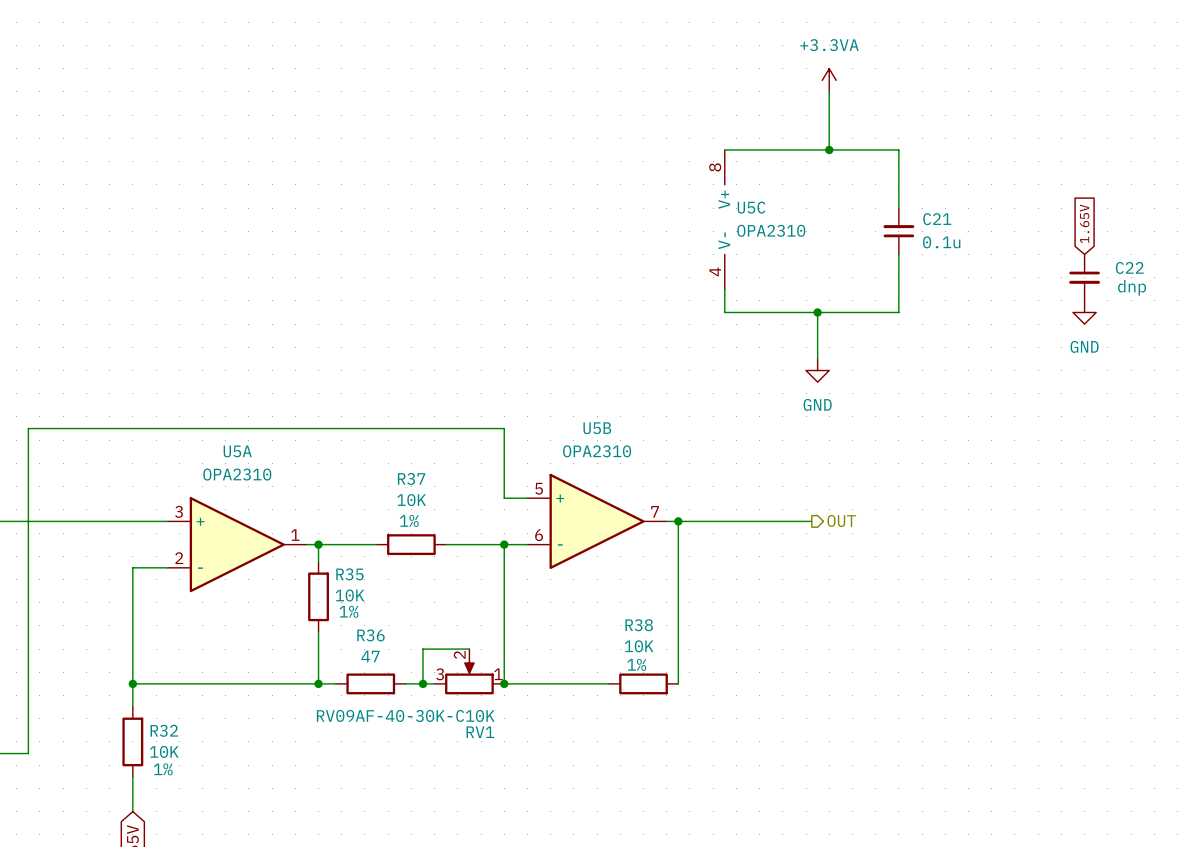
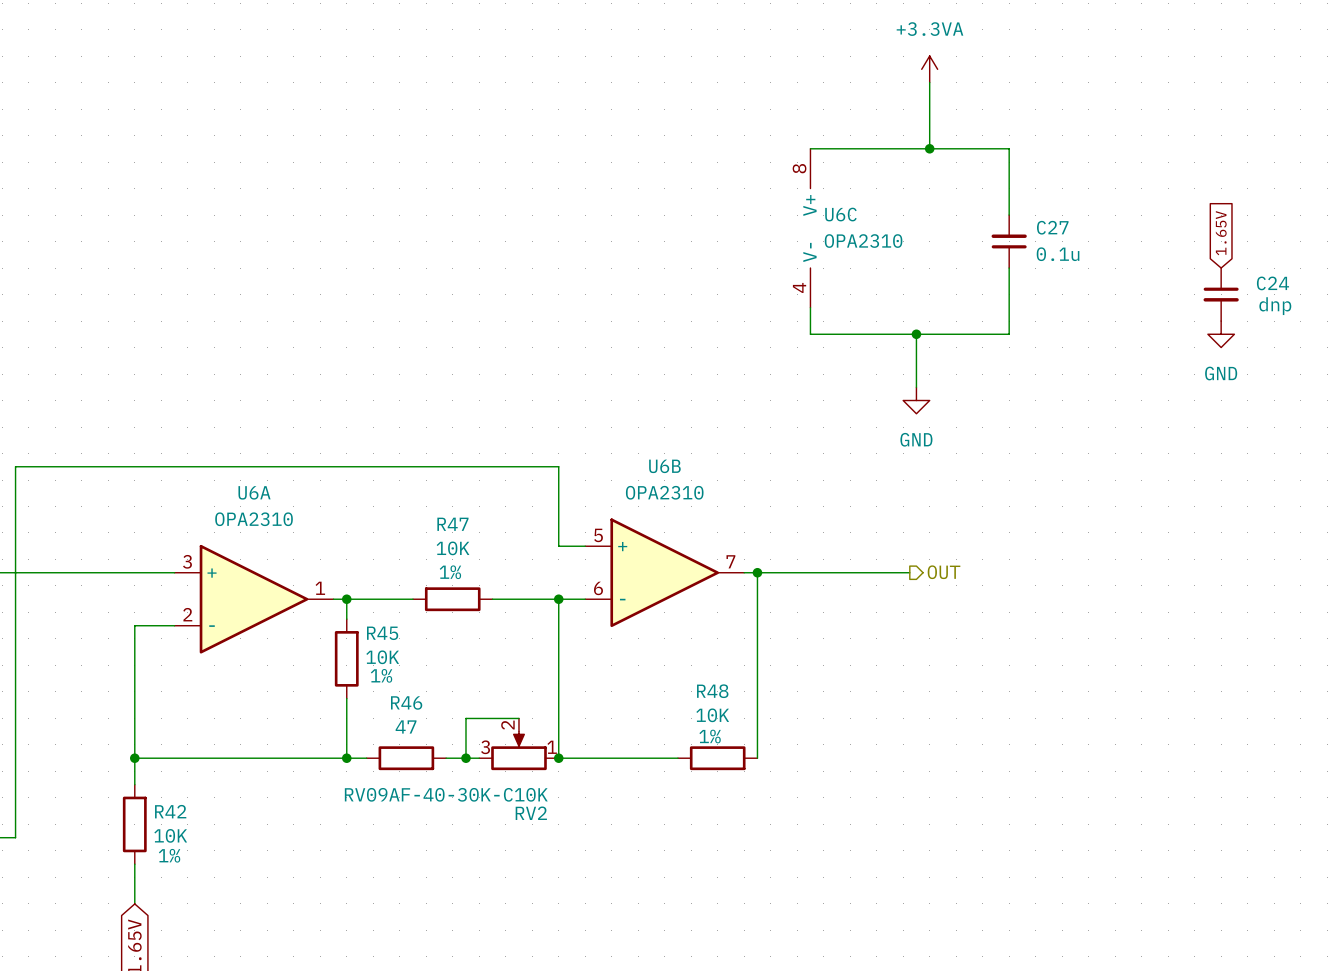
U5C name: U5C (751, 207) -> U6C (840, 214)
C21 name: C21 (937, 219) -> C27 (1052, 227)
C22 name: C22 (1129, 267) -> C24 (1272, 283)
U5B name: U5B (597, 428) -> U6B (664, 466)
U5A name: U5A (237, 451) -> U6A (254, 492)
R37 name: R37 (411, 478) -> R47 (452, 524)
R35 name: R35 (349, 574) -> R45 (382, 633)
R38 name: R38 (639, 625) -> R48 (712, 691)
R36 name: R36 (370, 635) -> R46 (406, 702)
R32 name: R32 (164, 730) -> R42 (170, 811)
RV1 name: RV1 (480, 732) -> RV2 (531, 813)

